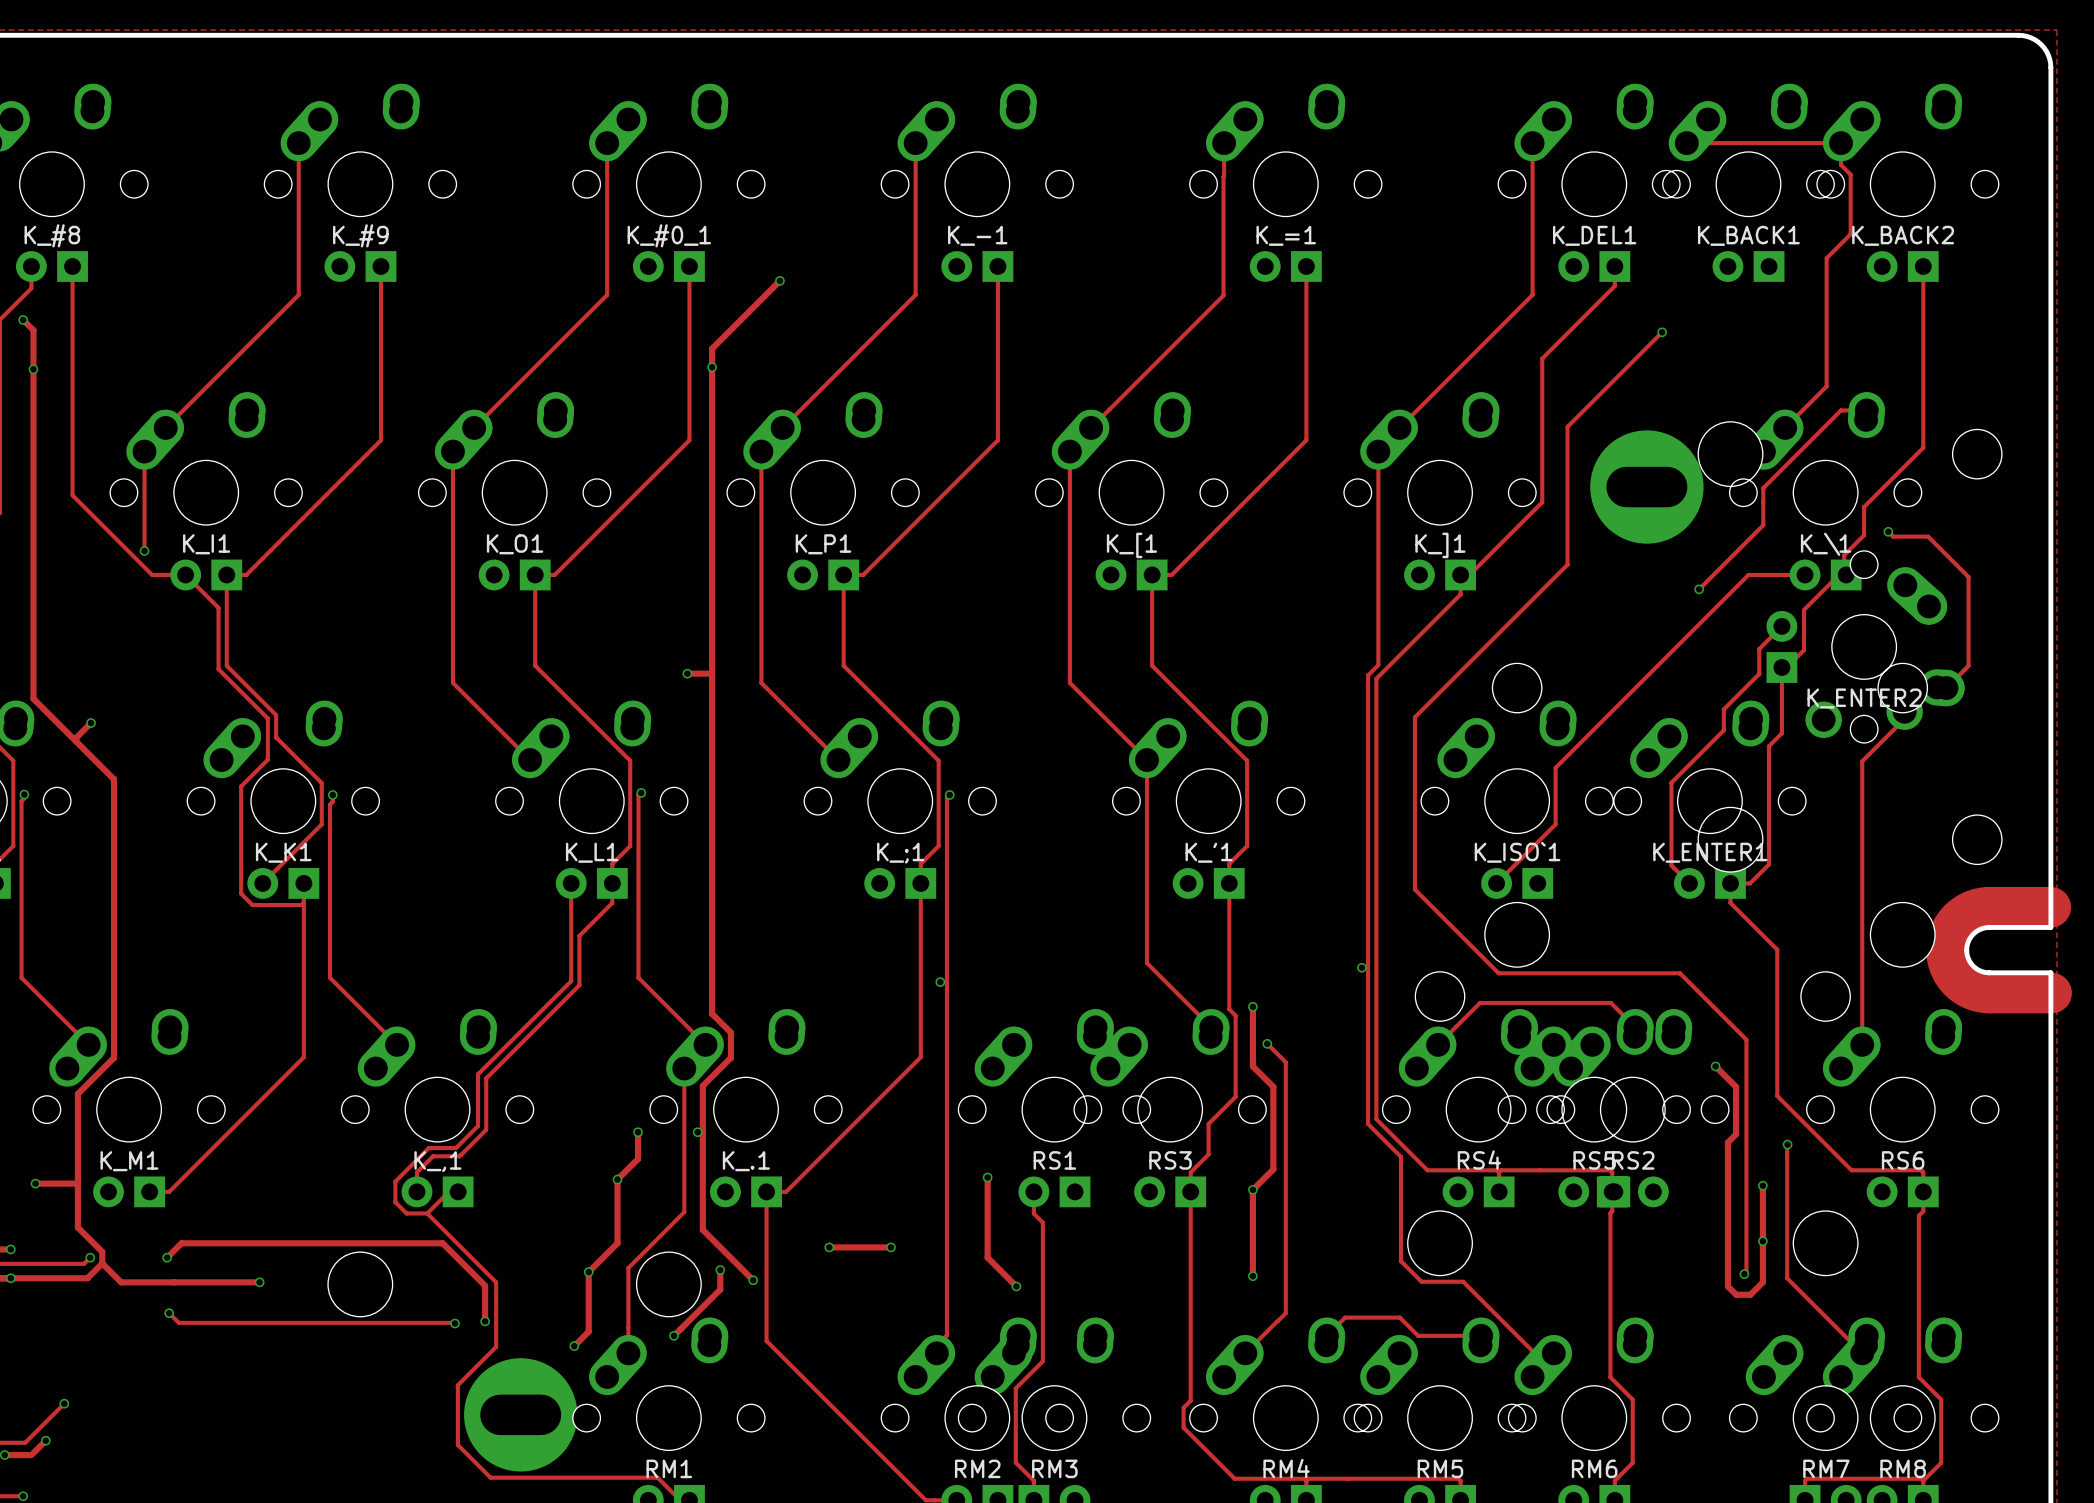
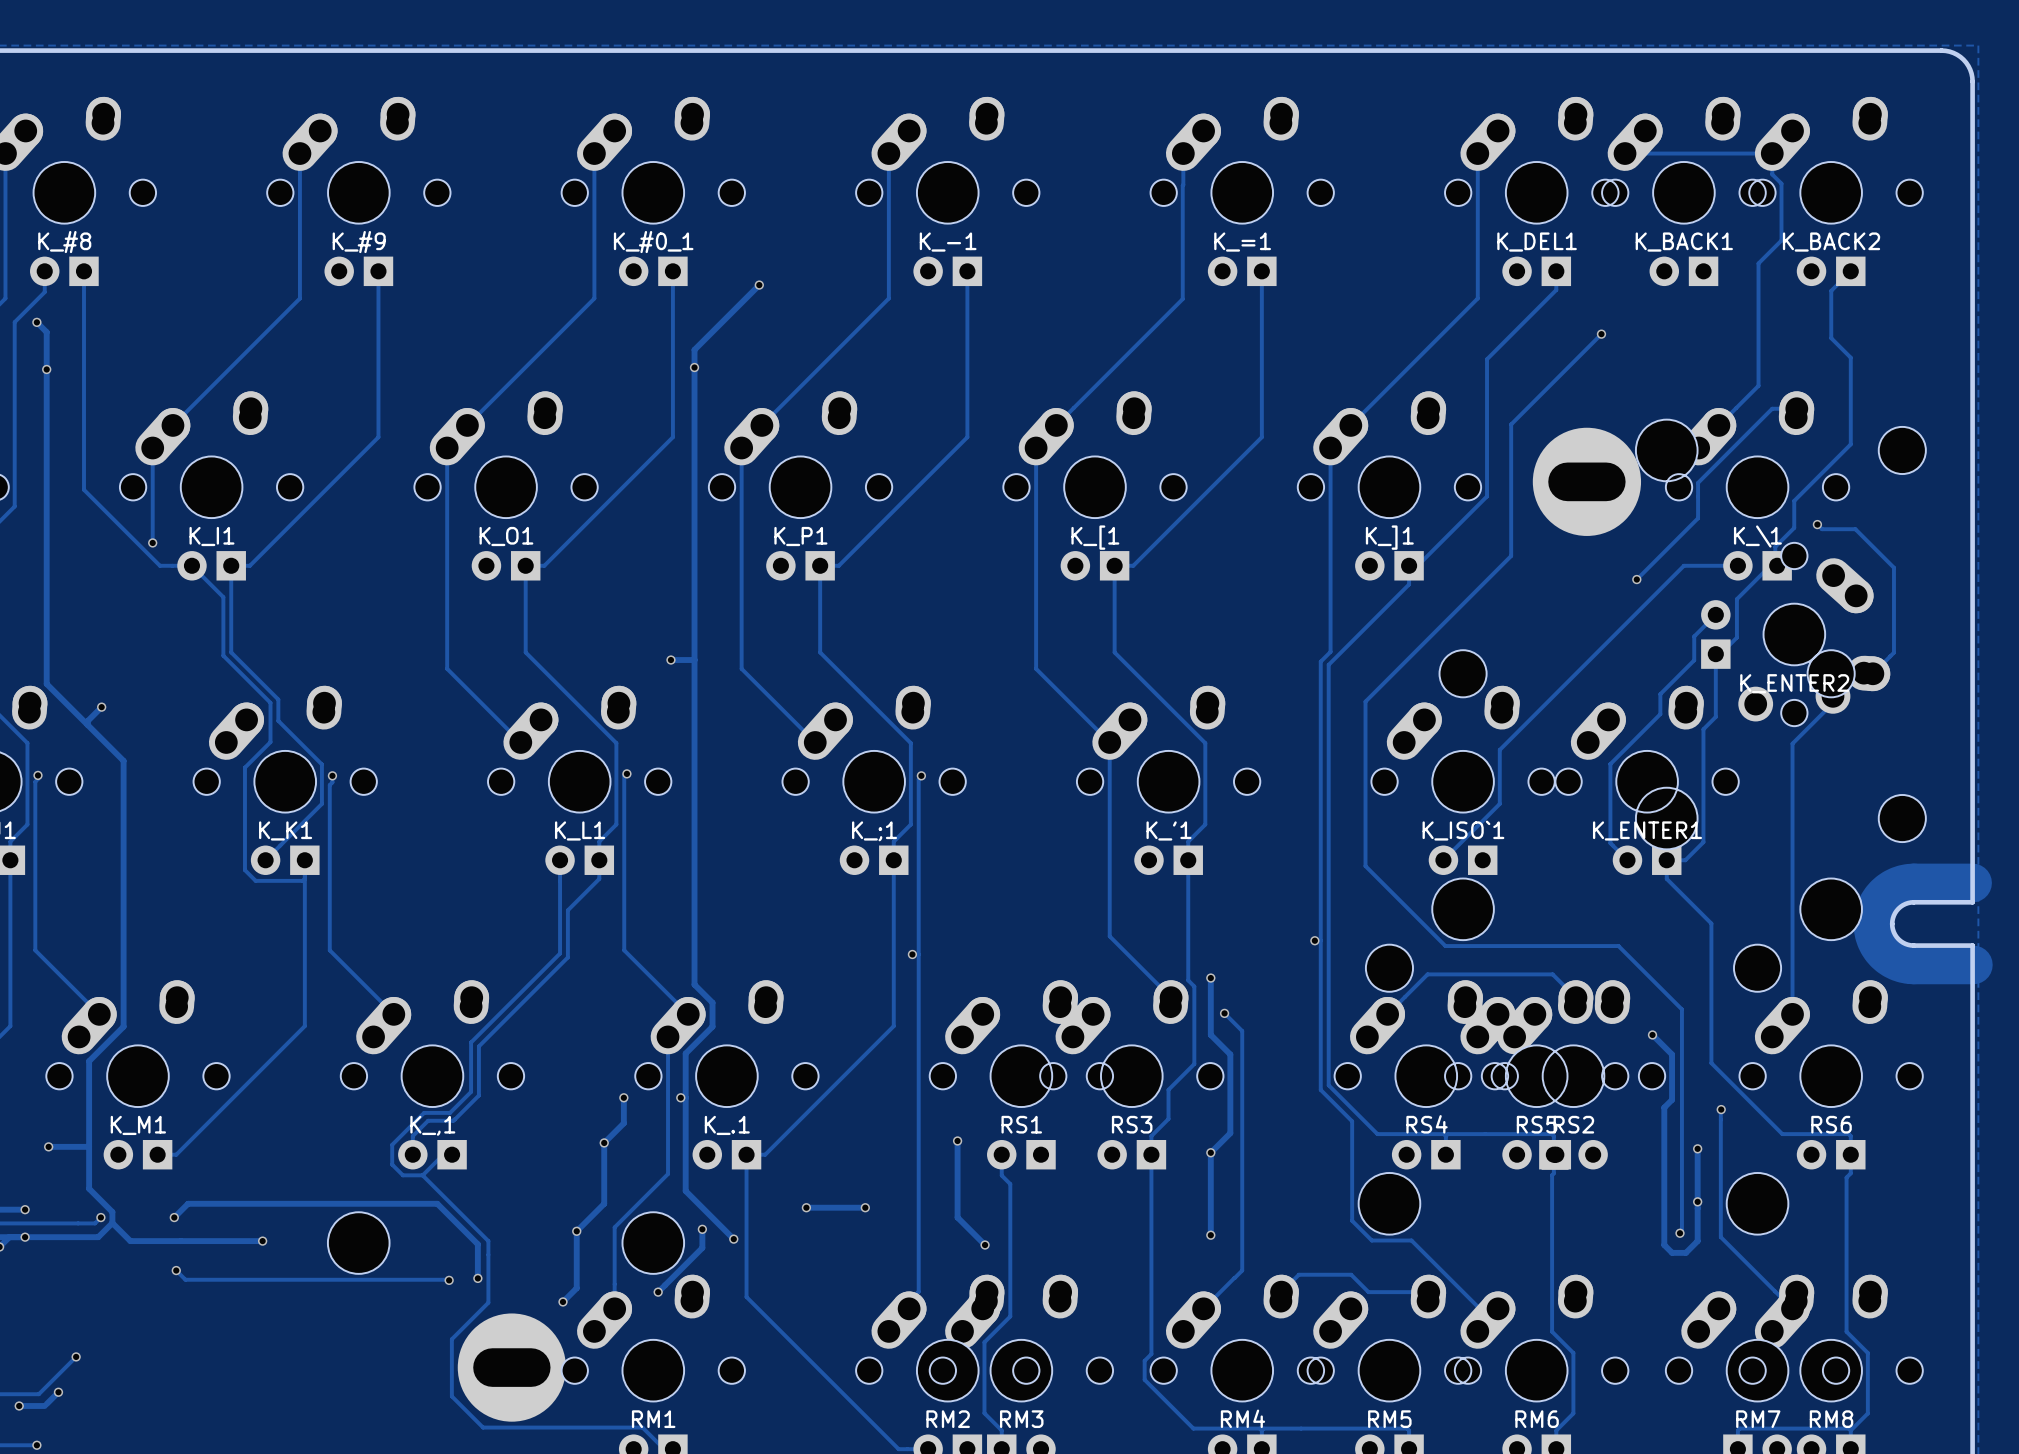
track: (1923, 266) (1923, 356) -> (1850, 271) (1831, 290) (1831, 338) (1850, 357)

